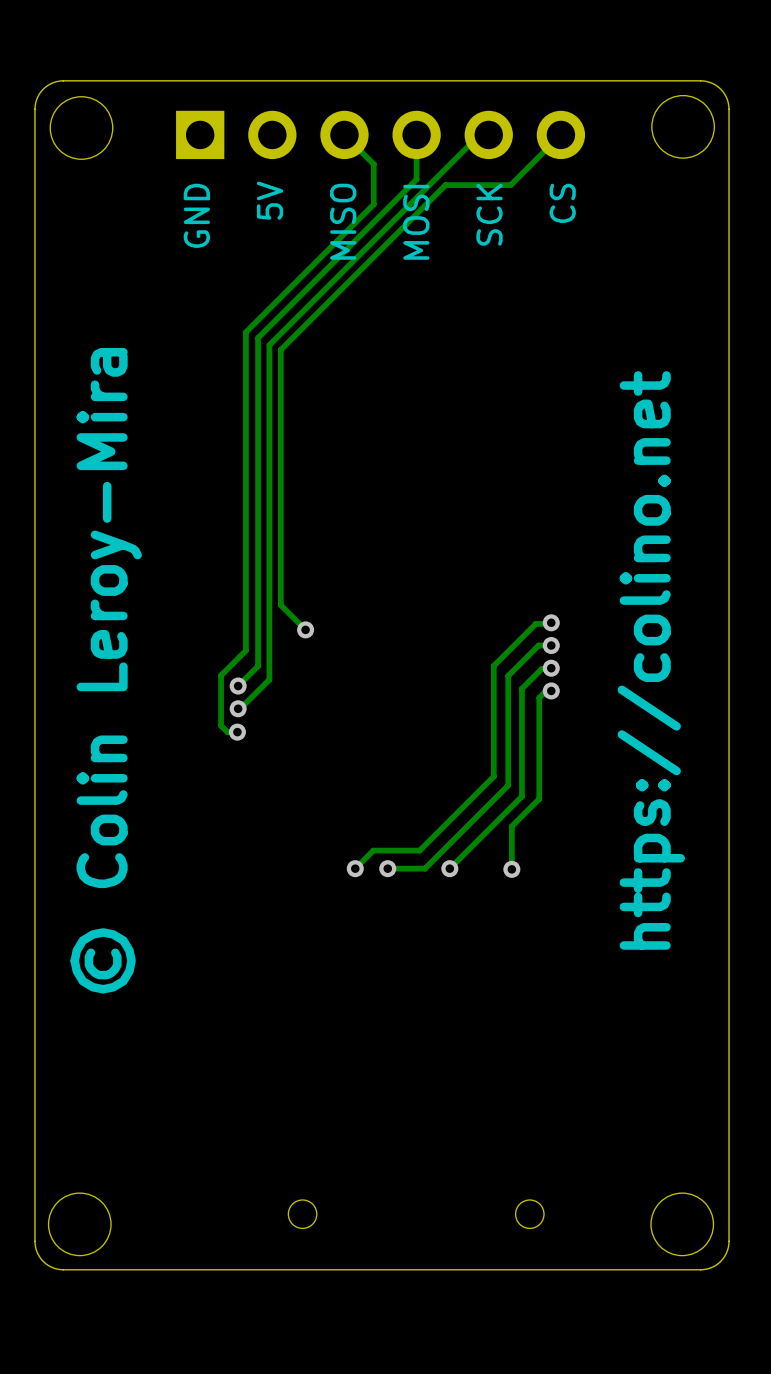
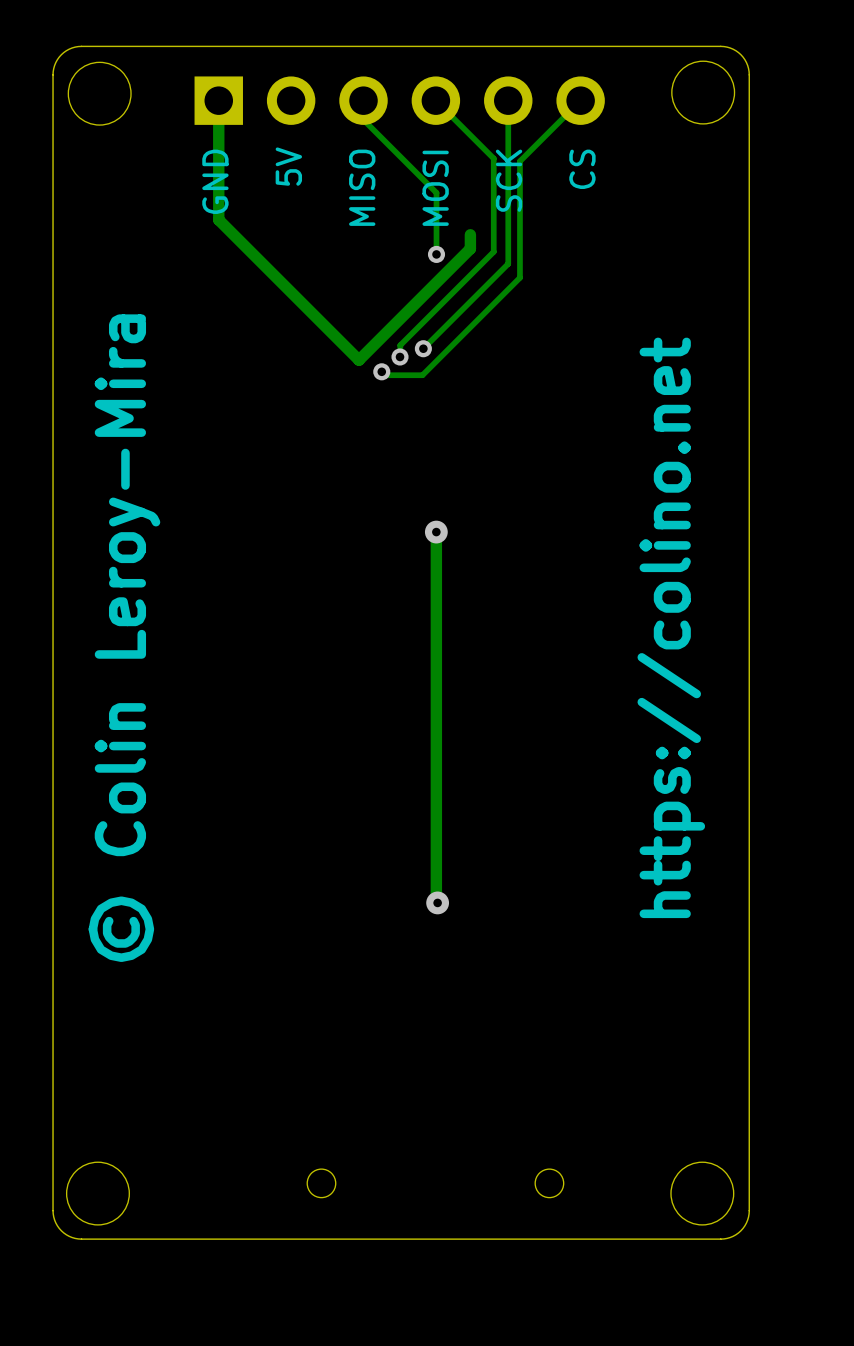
track: none -> (218, 100) (218, 219) (359, 360) (470, 248) (470, 234)
track: (416, 134) (416, 179) (258, 338) (258, 666) (238, 686) -> (435, 100) (493, 158) (493, 251) (400, 345) (400, 356)
track: (488, 134) (479, 134) (269, 345) (269, 679) (238, 708) -> (508, 100) (508, 263) (423, 348)
track: (345, 136) (373, 164) (373, 204) (245, 332) (245, 650) (221, 675) (221, 725) (227, 732) (237, 732) -> (364, 101) (364, 121) (436, 192) (436, 254)
track: (510, 185) (445, 185) (280, 349) (280, 605) (305, 629) -> (530, 150) (519, 161) (519, 277) (422, 375) (384, 375) (381, 371)
via: none -> (436, 254)
via: none -> (423, 348)
via: none -> (400, 356)
via: none -> (381, 371)
track: none -> (436, 532) (437, 902)
via: none -> (436, 532)
track: (552, 621) (548, 623) (535, 623) (493, 665) (493, 776) (419, 850) (373, 850) (355, 868) -> none
via: (551, 622) -> none
via: (305, 629) -> none
track: (552, 644) (538, 645) (508, 675) (508, 785) (424, 868) (387, 868) -> none
via: (551, 645) -> none
track: (553, 666) (550, 669) (541, 669) (521, 688) (521, 796) (449, 868) -> none
via: (551, 668) -> none
via: (238, 686) -> none
track: (553, 689) (546, 690) (539, 697) (539, 798) (511, 826) (511, 869) -> none
via: (551, 690) -> none
via: (238, 708) -> none
via: (237, 732) -> none
via: (355, 868) -> none
via: (387, 868) -> none
via: (449, 868) -> none
via: (511, 869) -> none
via: none -> (437, 902)

